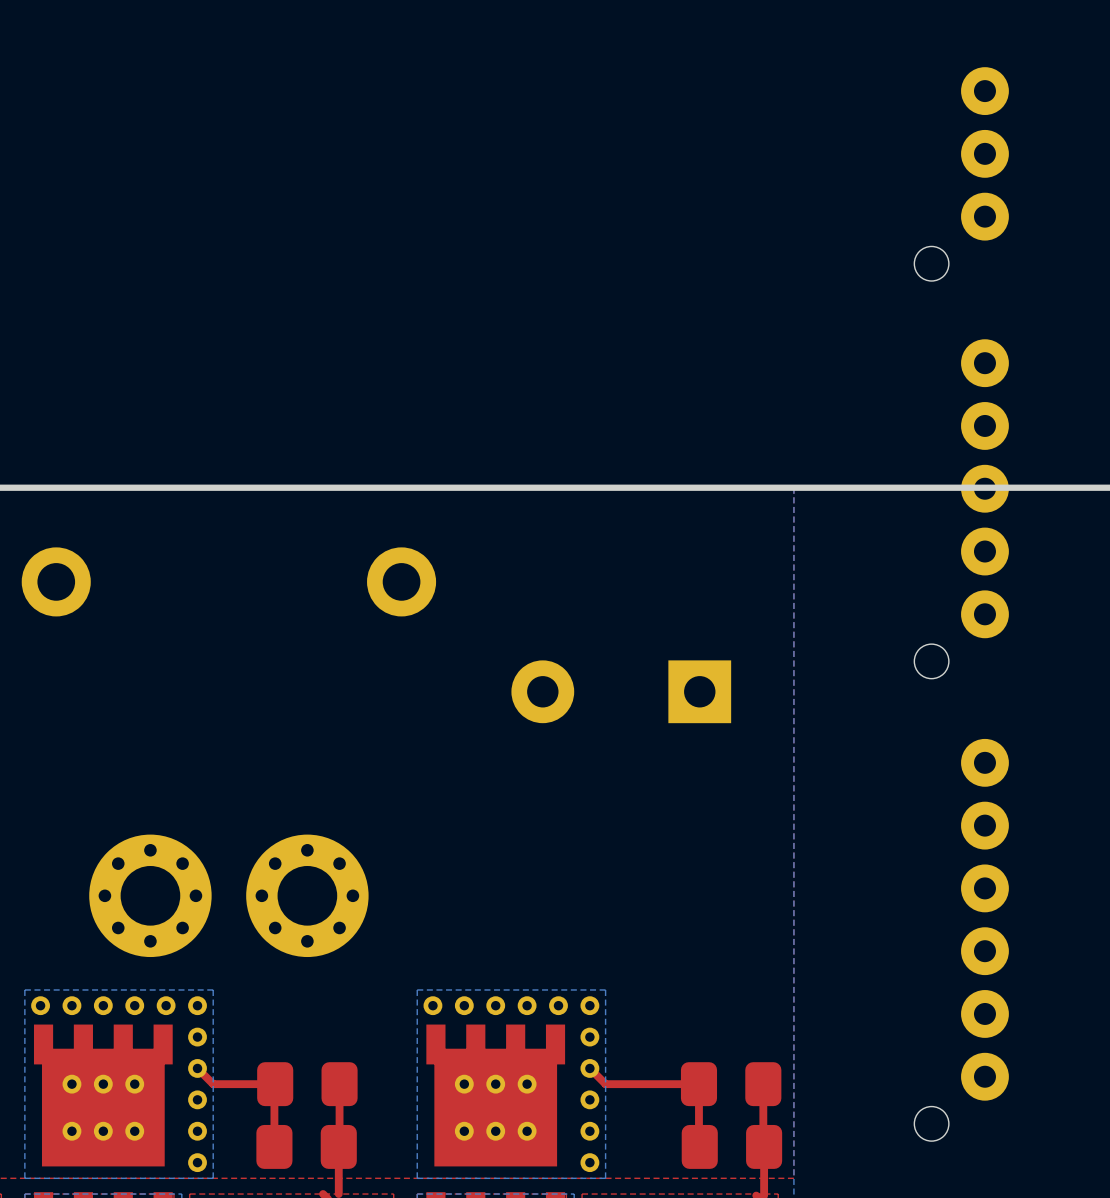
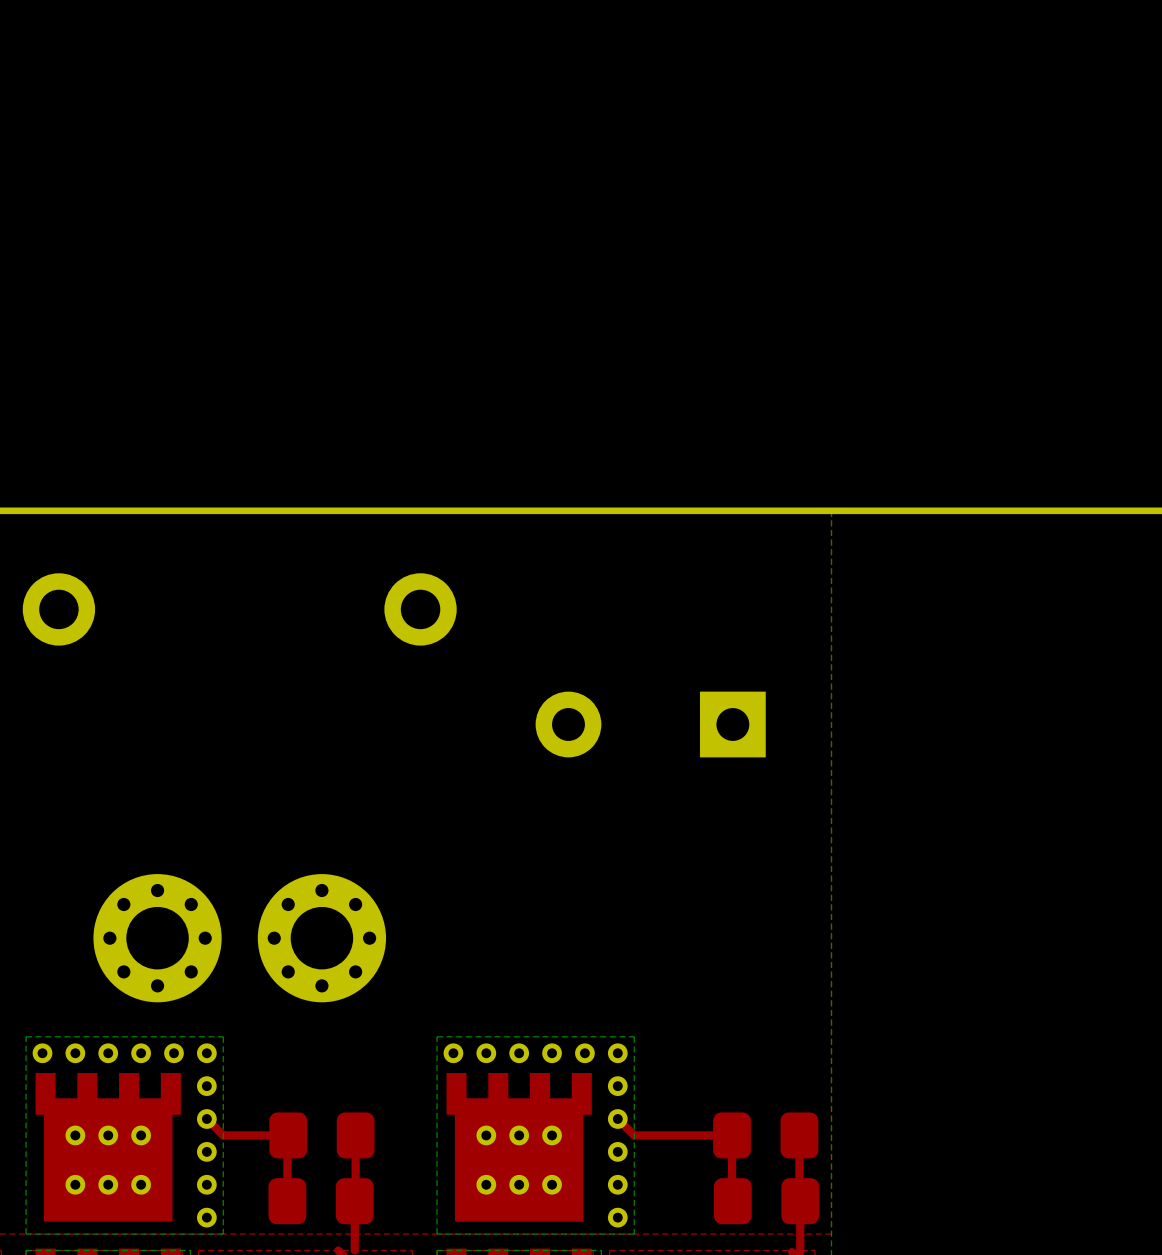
part: (961, 174) -> none
part: (961, 508) -> none
part: (961, 940) -> none

